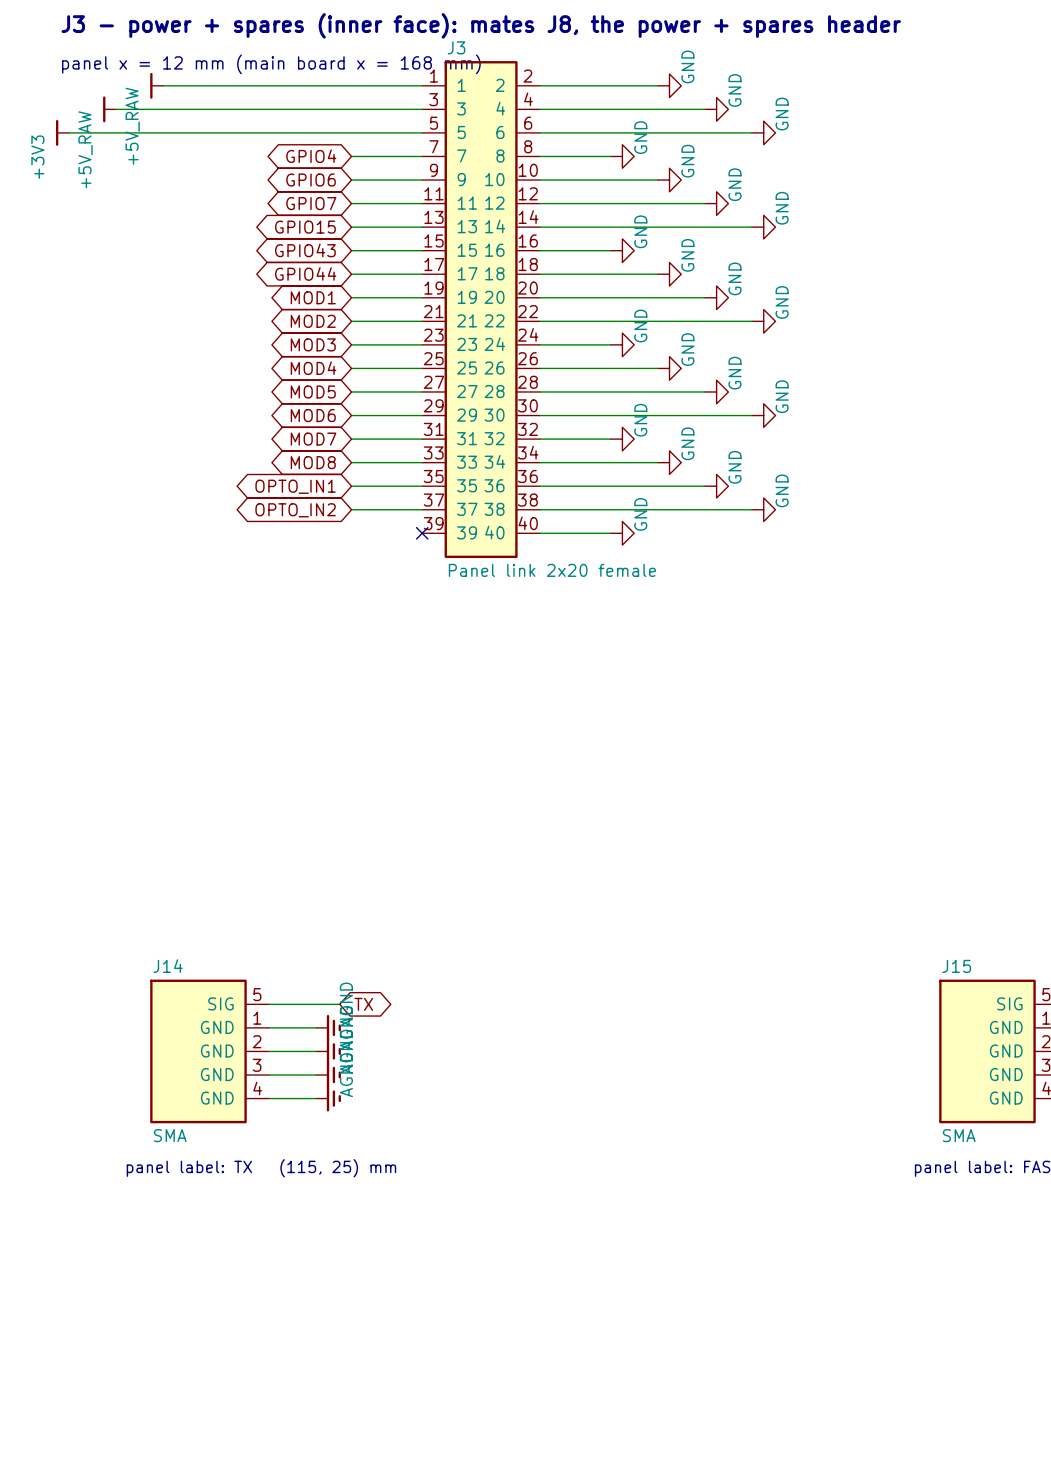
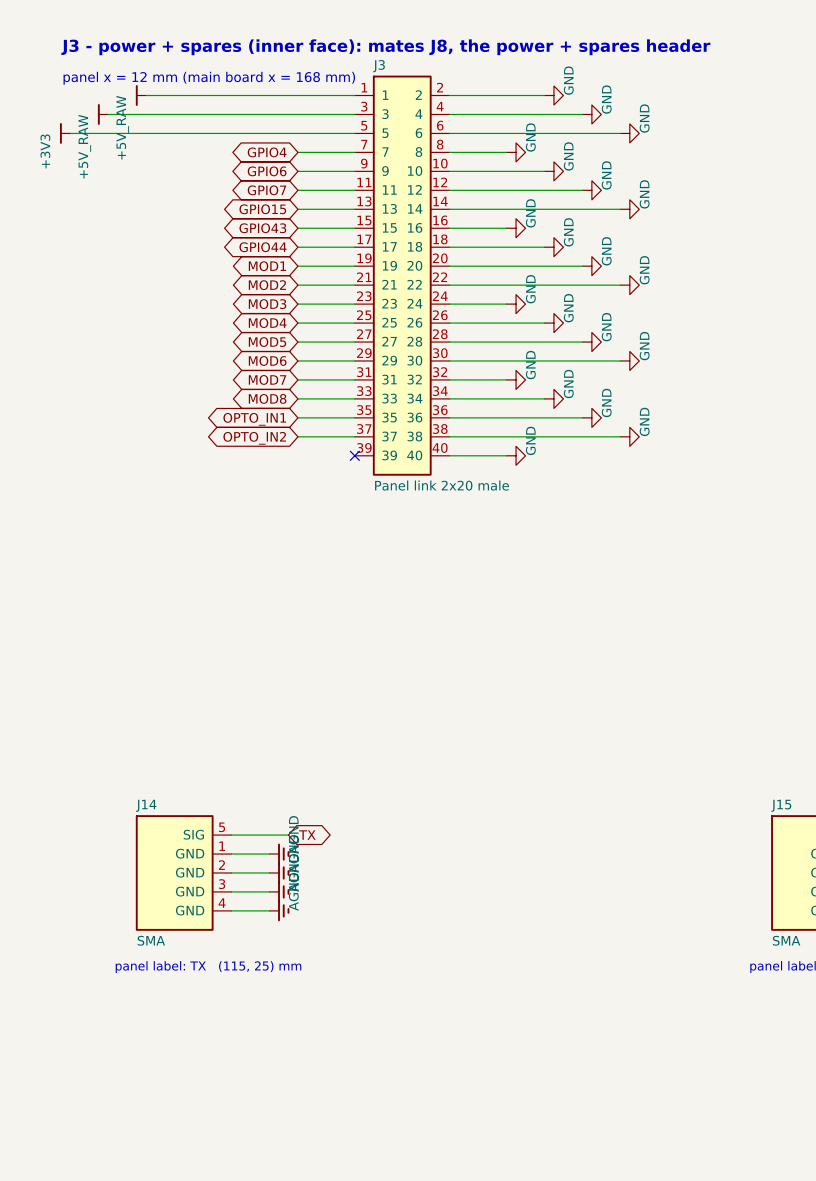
J3 value: Panel link 2x20 female (552, 570) -> Panel link 2x20 male (442, 485)

